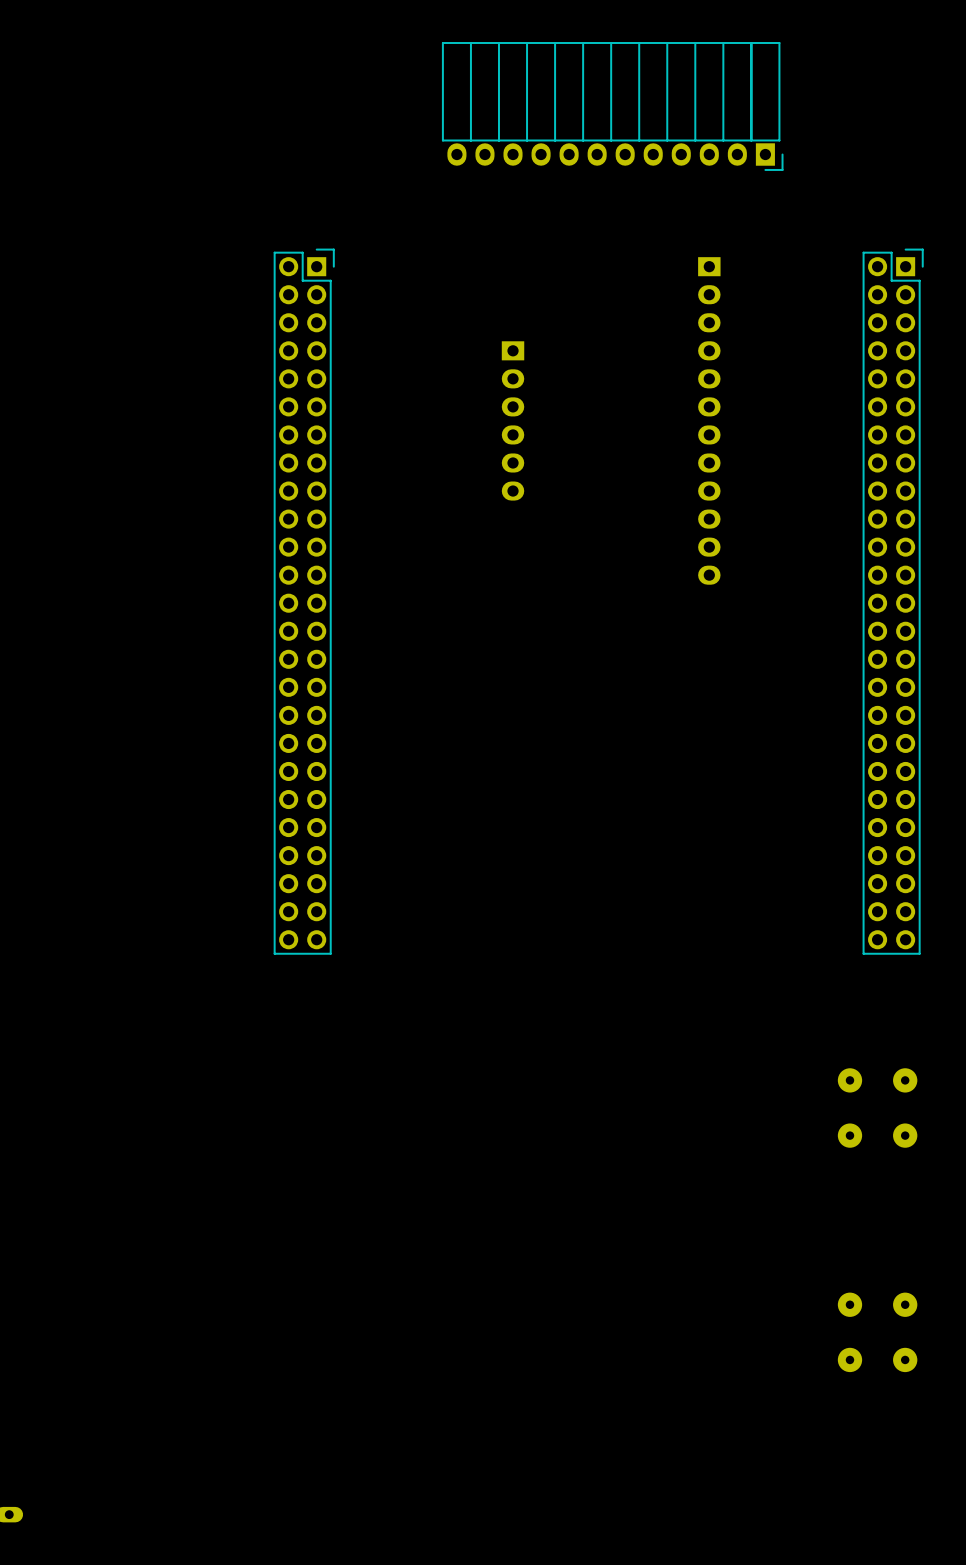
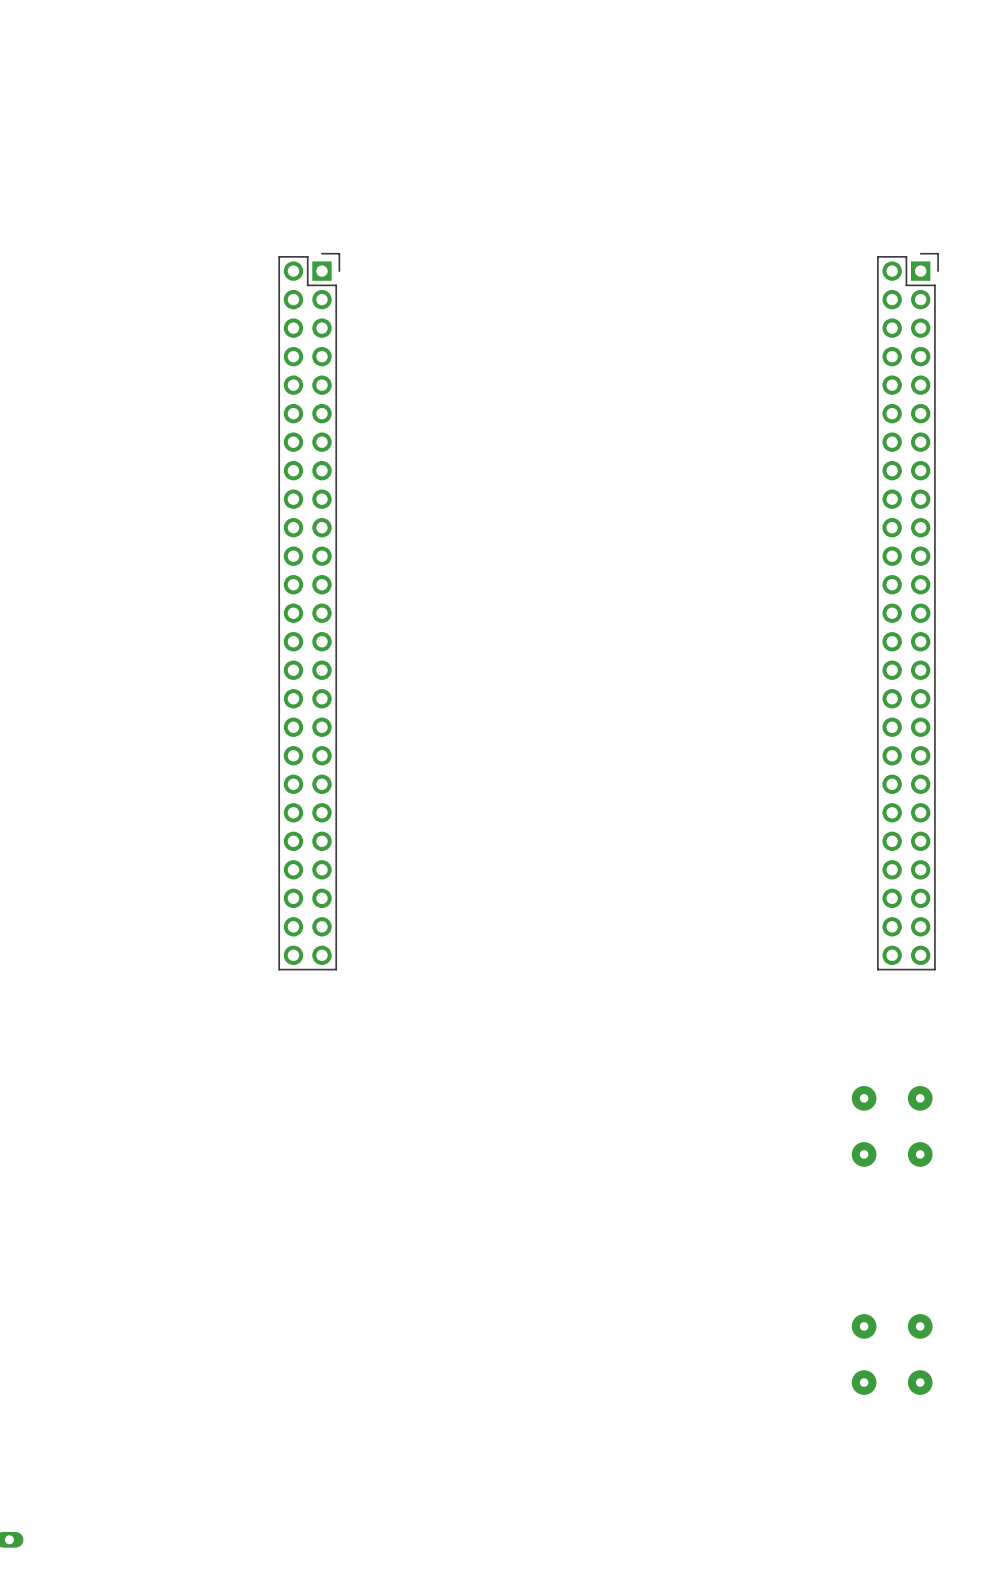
part: (612, 106) -> none
part: (513, 420) -> none
part: (709, 420) -> none

